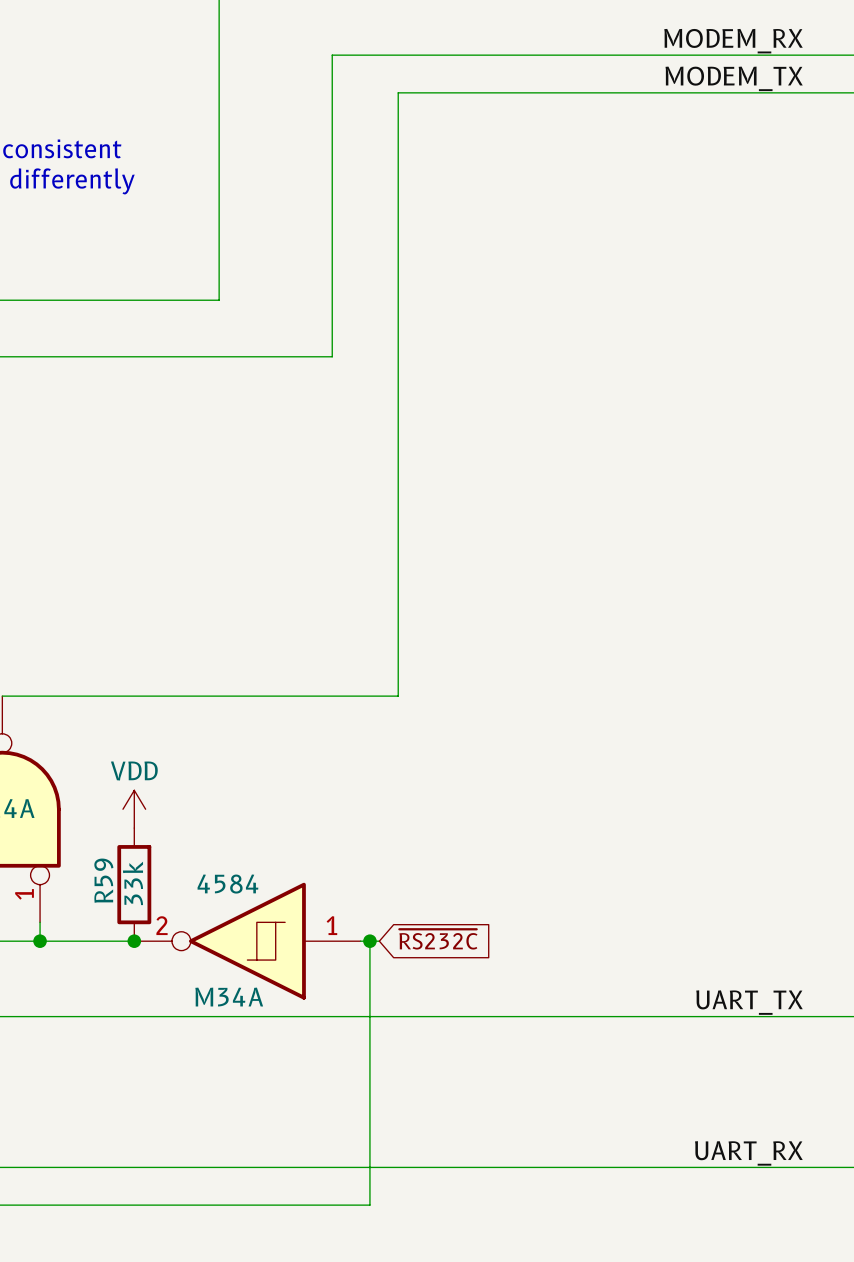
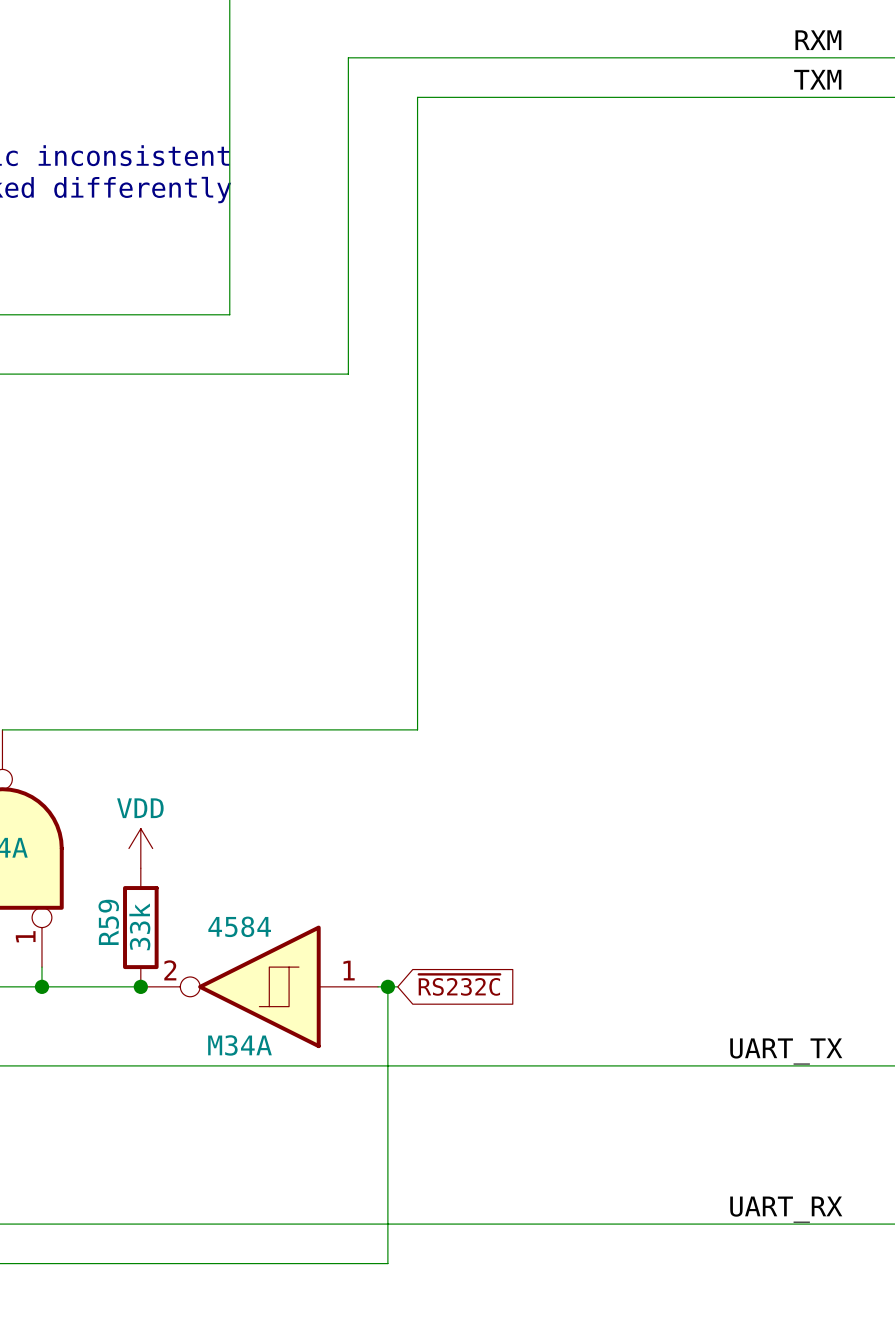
label: MODEM_RX (733, 41) -> RXM (818, 40)
label: MODEM_TX (734, 78) -> TXM (817, 79)

